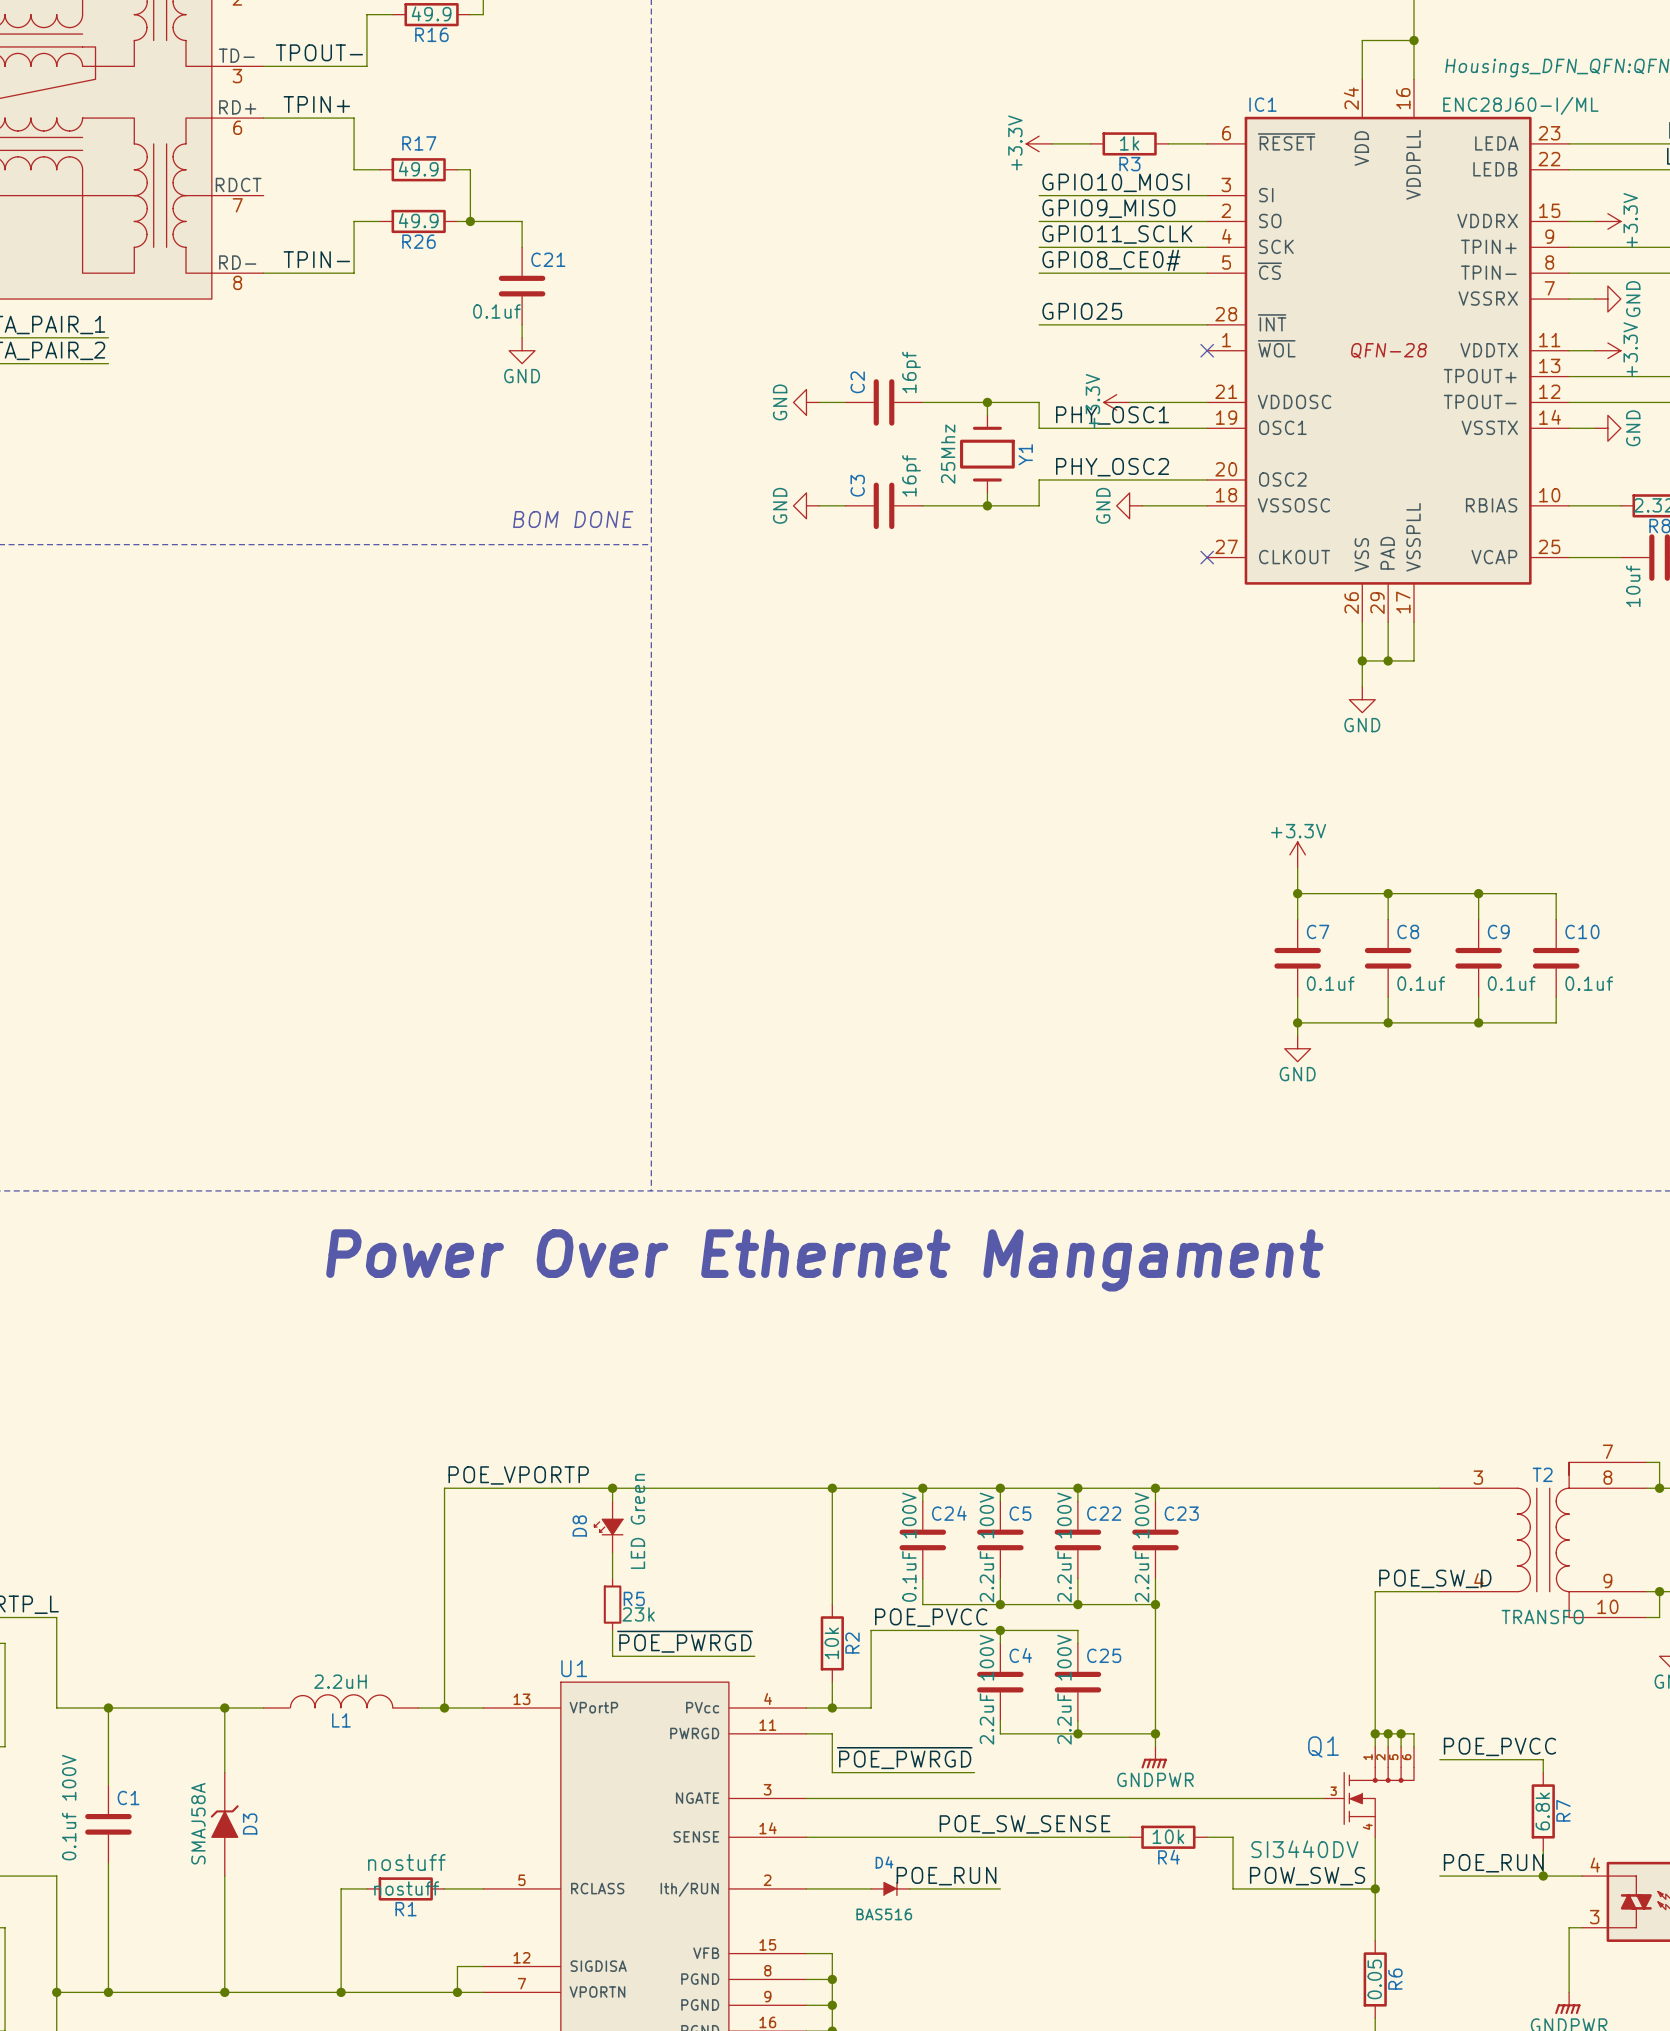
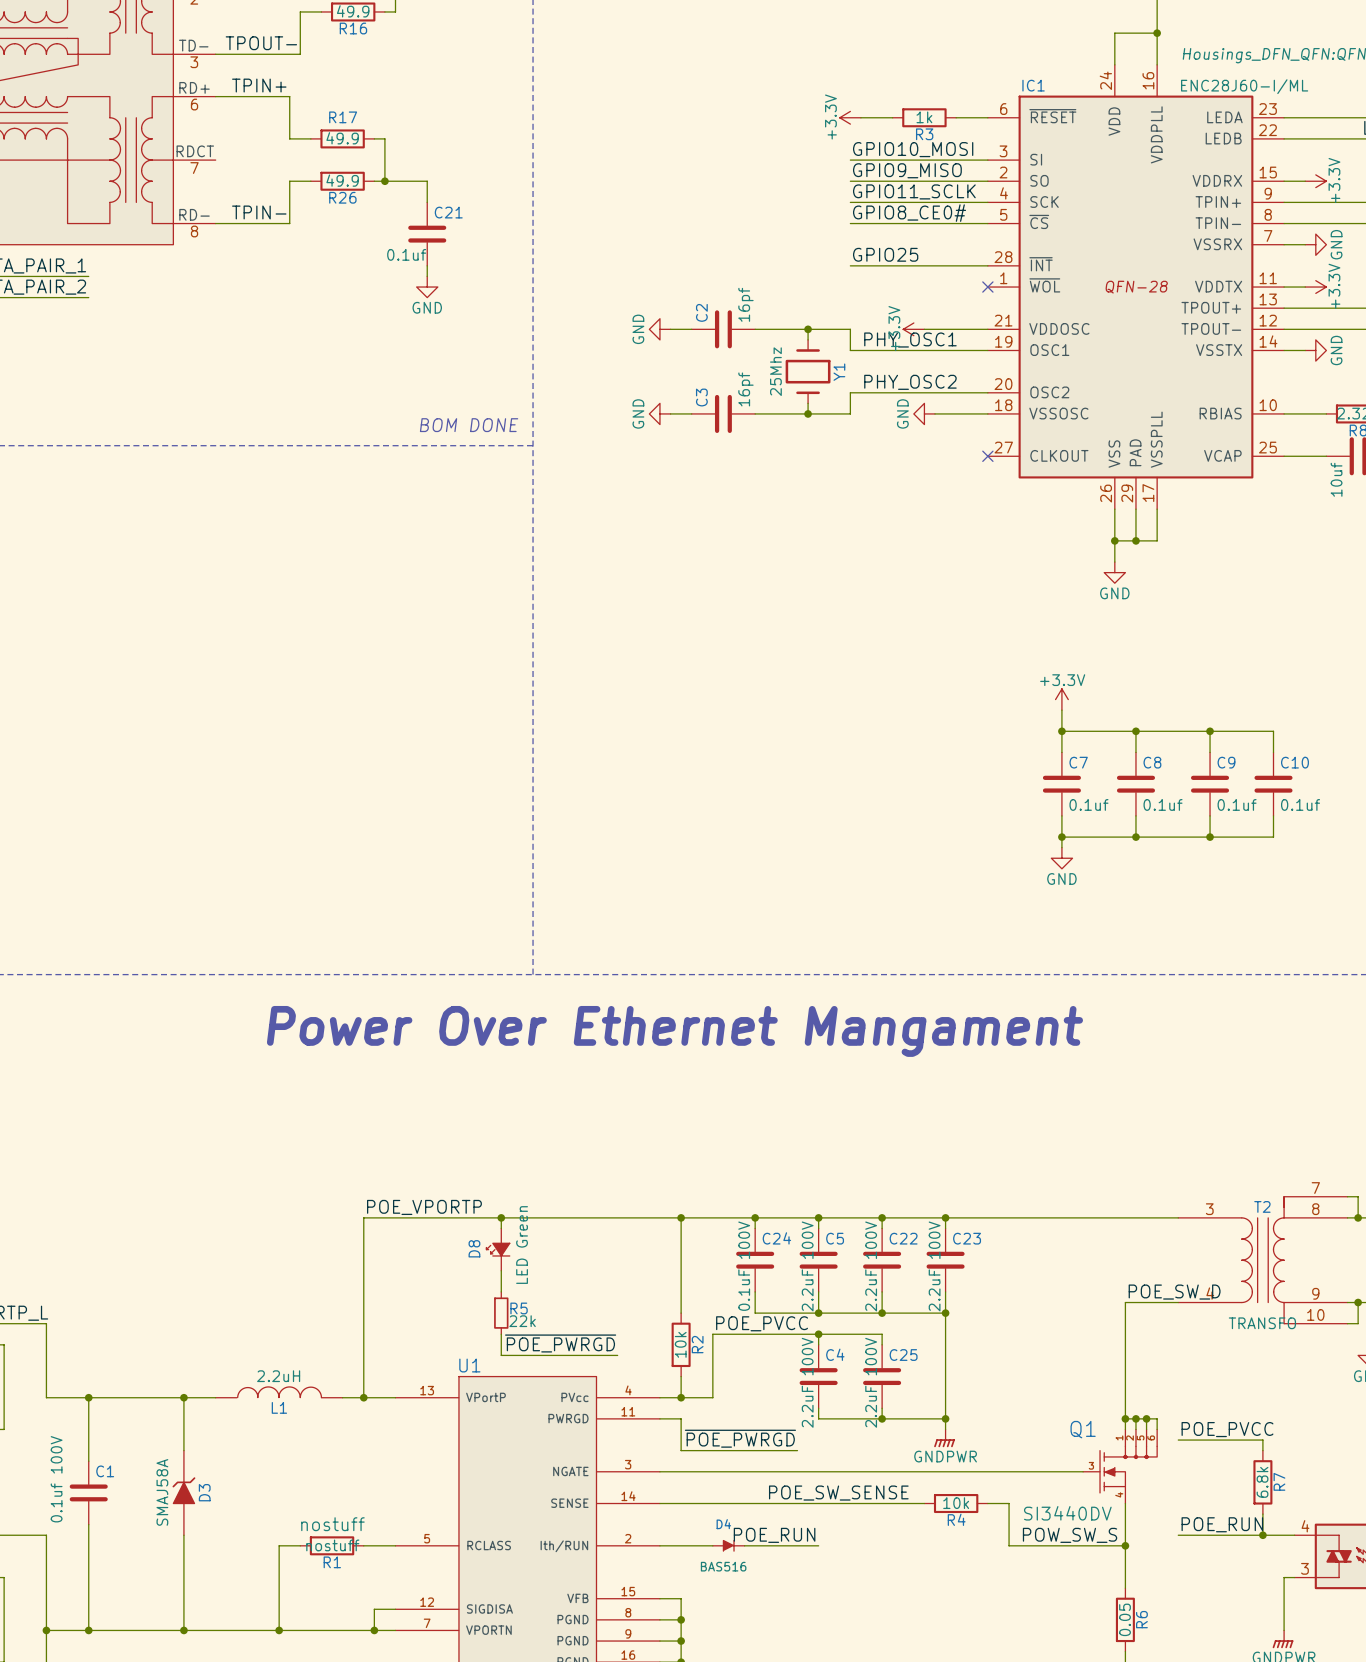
R5 value: 23k (638, 1614) -> 22k (522, 1321)

